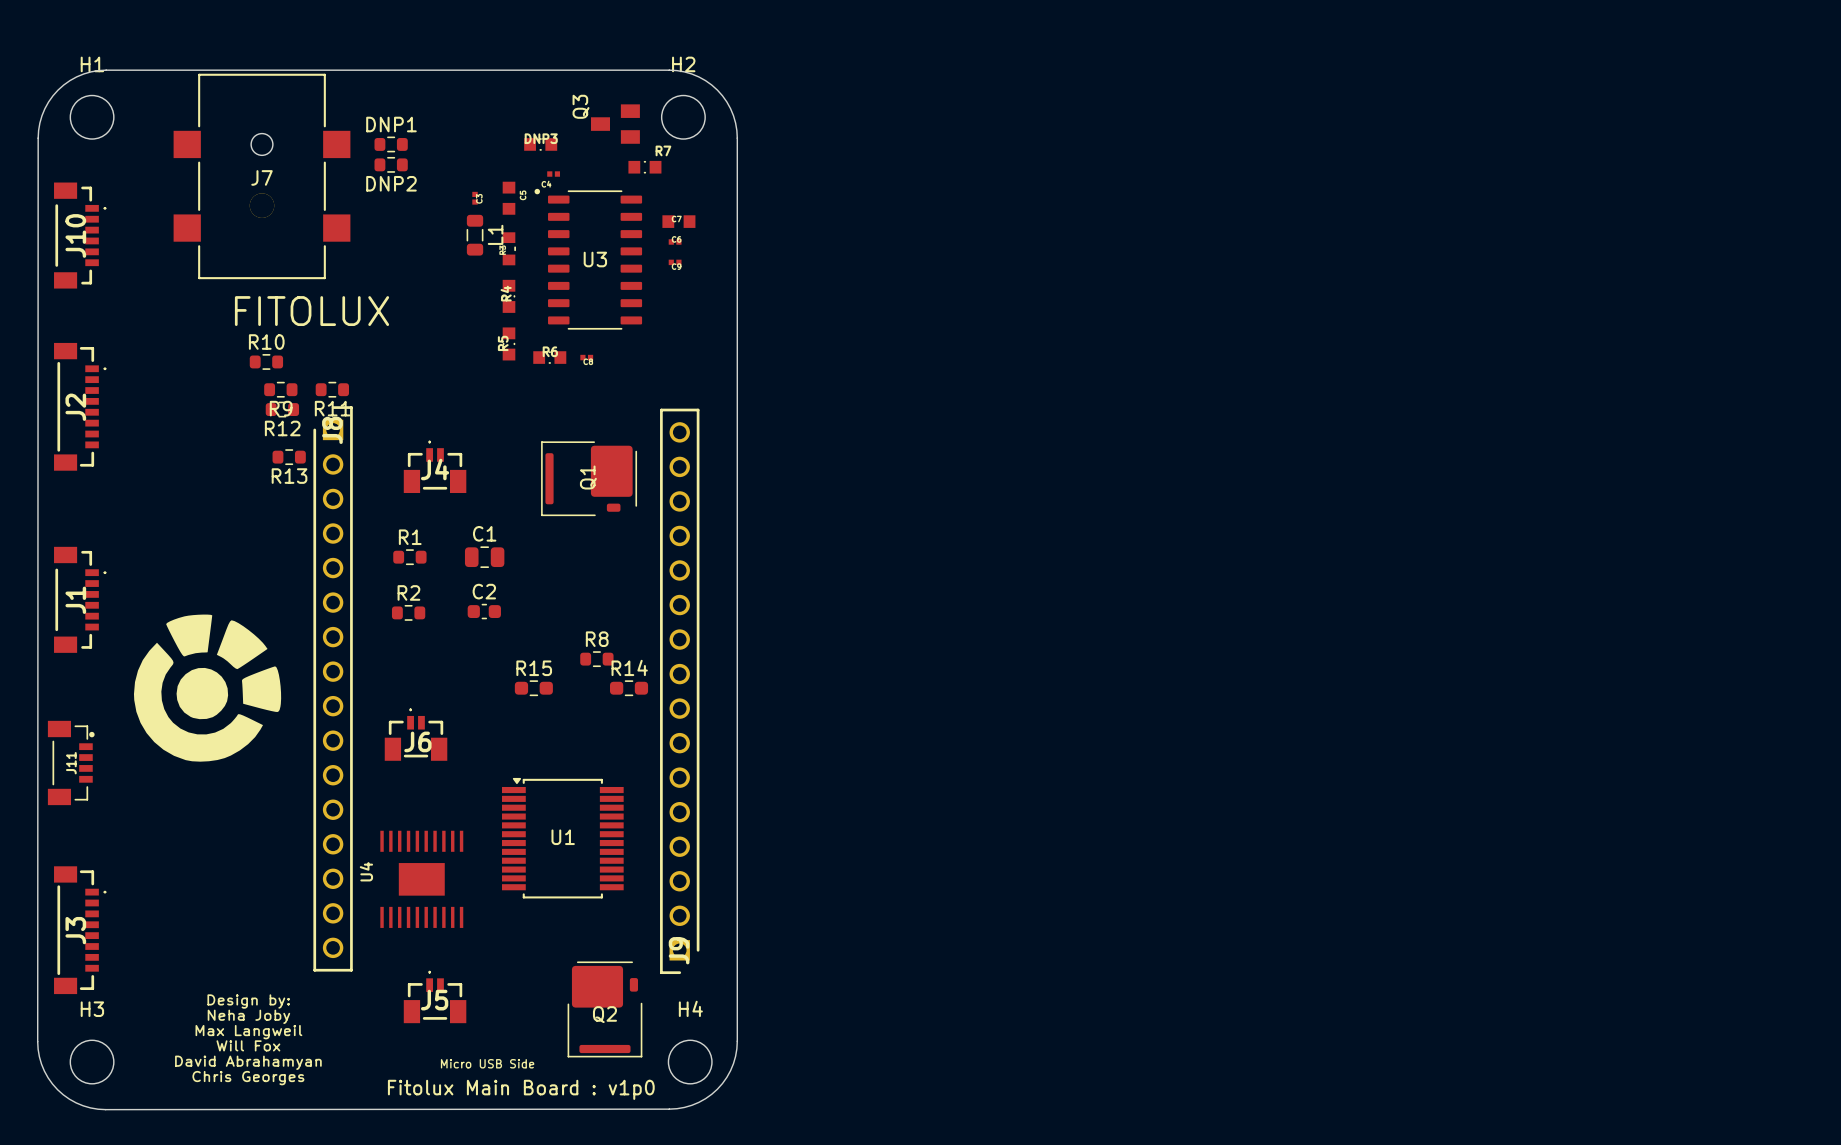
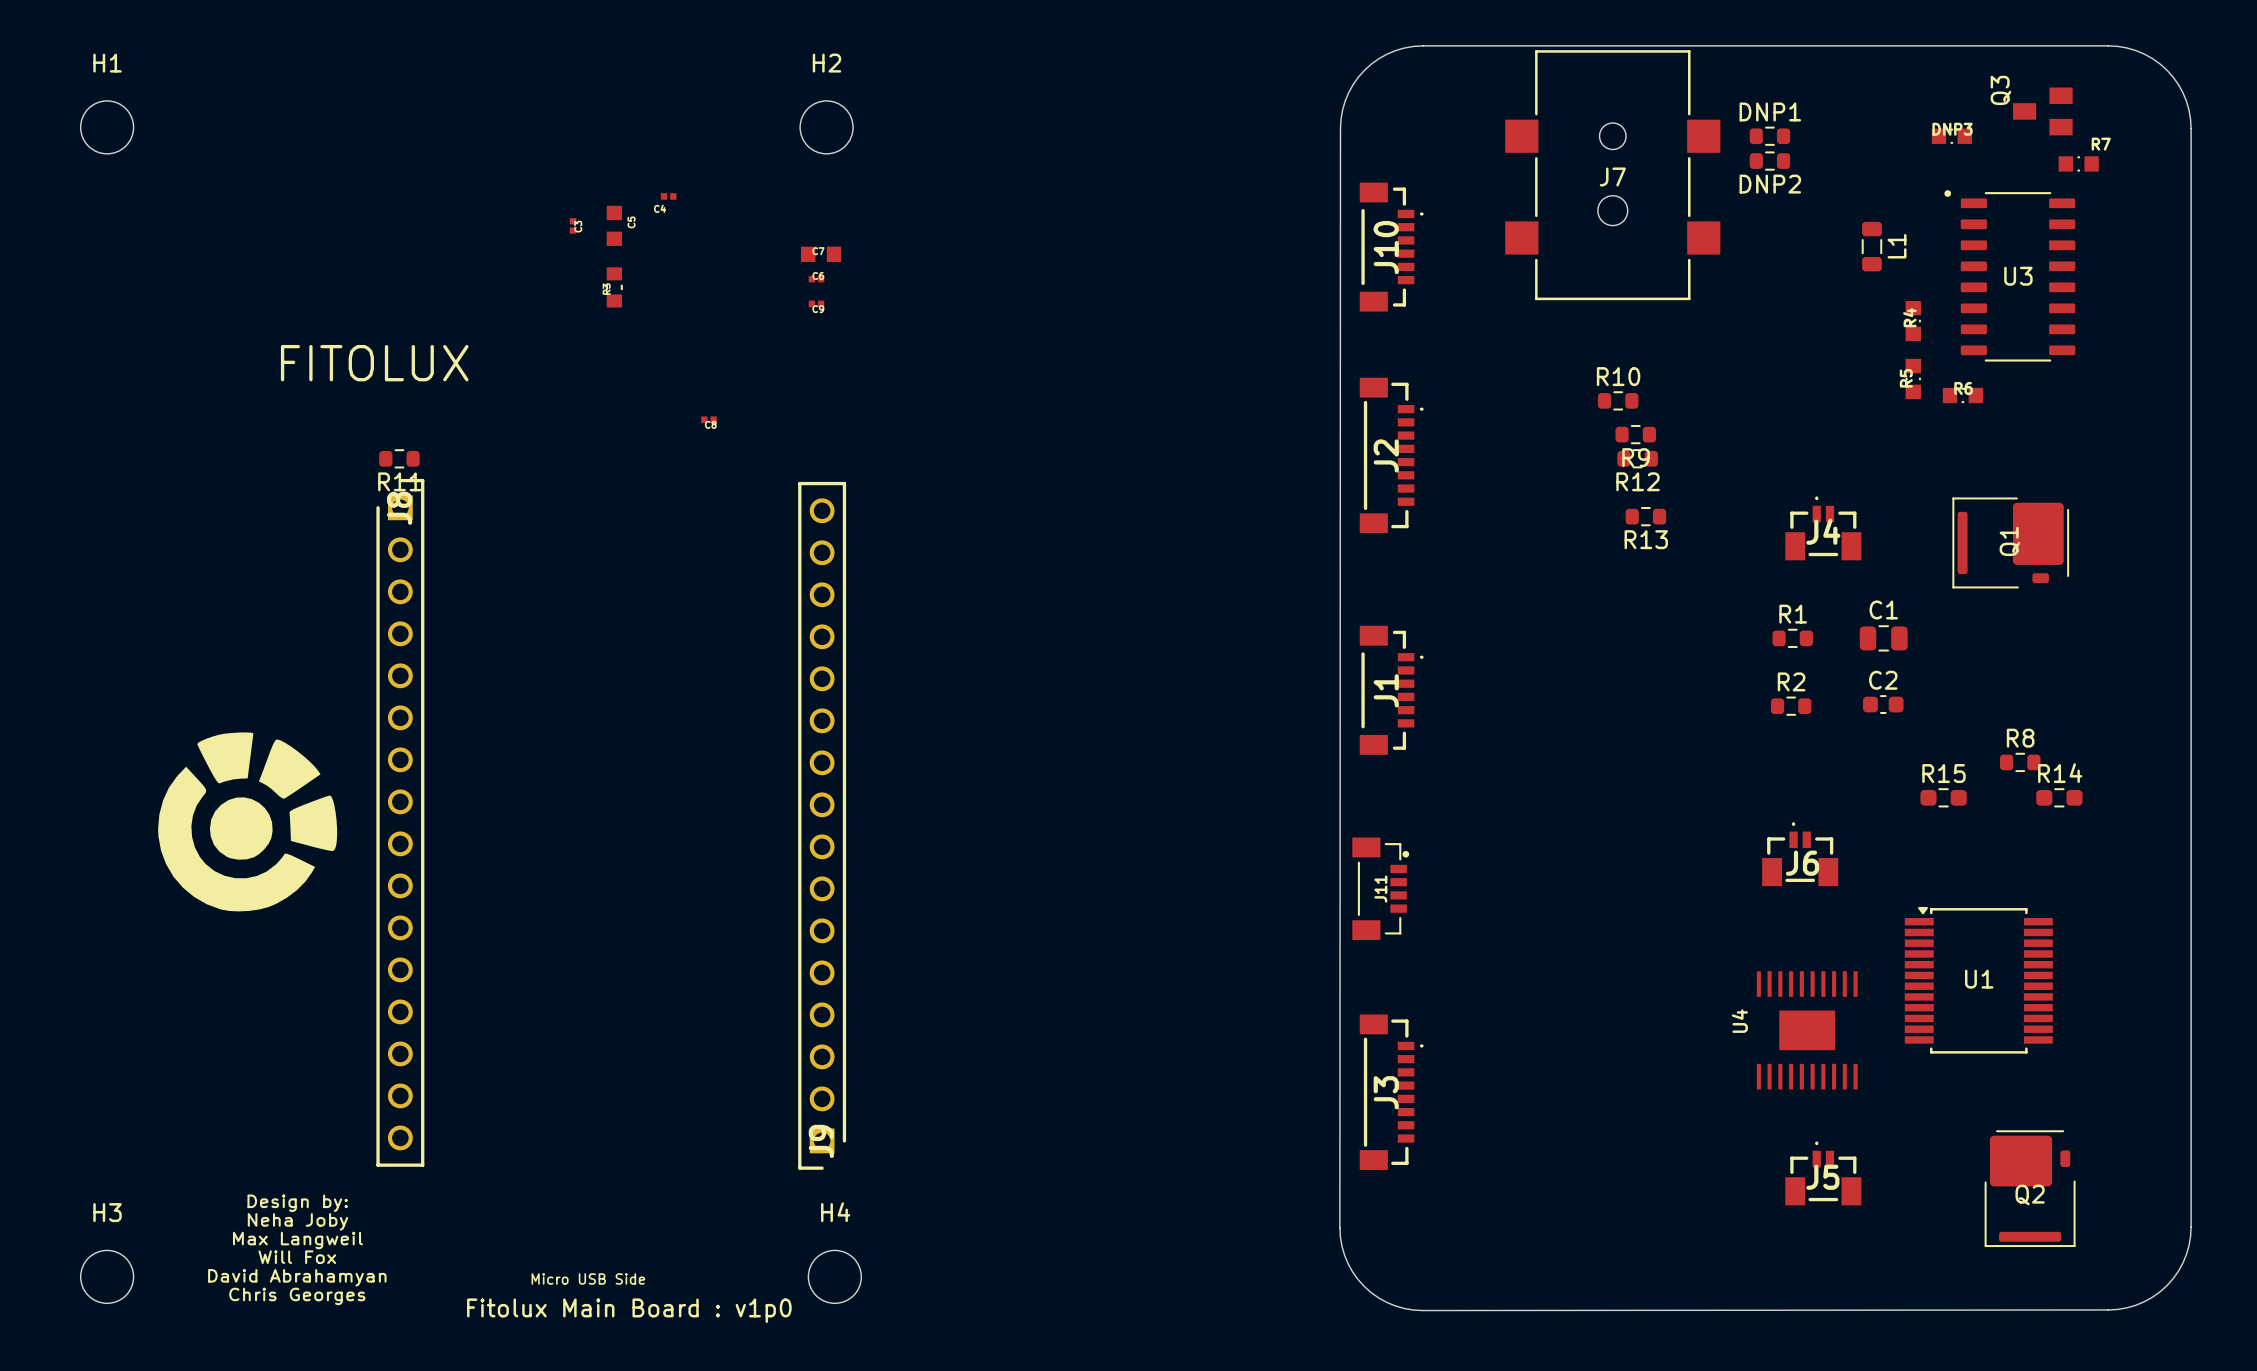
board edge: none -> (1423, 45) (2108, 45) (2135, 50) (2152, 58) (2166, 70) (2178, 84) (2189, 110) (2191, 128) (2191, 1227) (2189, 1245) (2178, 1271) (2166, 1285) (2152, 1297) (2126, 1307) (2108, 1309) (1422, 1310) (1404, 1308) (1378, 1297) (1364, 1286) (1352, 1271) (1341, 1246) (1339, 1227) (1341, 119) (1348, 92) (1364, 70) (1387, 54) (1404, 47) (1423, 45)
board edge: (106, 70) (669, 70) (684, 71) (698, 76) (711, 85) (726, 101) (733, 115) (737, 138) (737, 1041) (735, 1056) (730, 1070) (717, 1089) (705, 1098) (691, 1105) (669, 1109) (105, 1109) (90, 1107) (69, 1099) (57, 1089) (48, 1077) (41, 1064) (37, 1041) (38, 130) (41, 115) (48, 101) (63, 85) (83, 73) (106, 70) -> none
J7 footprint: [173, 73, 351, 280] -> [1505, 50, 1721, 301]
Q3 position: (615, 124) -> (2042, 111)
DNP1 position: (391, 144) -> (1769, 136)
DNP3 position: (540, 144) -> (1951, 136)
DNP2 position: (391, 164) -> (1769, 161)
R7 position: (644, 167) -> (2078, 163)
J10 position: (80, 235) -> (1391, 247)
L1 position: (475, 235) -> (1871, 246)
U3 position: (588, 259) -> (2009, 275)
R4 position: (509, 296) -> (1913, 321)
R5 position: (509, 343) -> (1913, 378)
R6 position: (549, 357) -> (1962, 395)
R10 position: (266, 361) -> (1618, 400)
R9 position: (280, 389) -> (1635, 434)
J2 position: (80, 406) -> (1391, 455)
R12 position: (282, 409) -> (1637, 458)
R13 position: (289, 457) -> (1645, 516)
J4 position: (435, 466) -> (1823, 528)
Q1 position: (589, 478) -> (2010, 542)
R1 position: (409, 557) -> (1792, 638)
C1 position: (484, 557) -> (1883, 638)
J1 position: (80, 599) -> (1391, 690)
C2 position: (484, 611) -> (1883, 704)
R2 position: (408, 612) -> (1791, 706)
R8 position: (596, 659) -> (2020, 762)
R15 position: (533, 688) -> (1943, 797)
R14 position: (629, 688) -> (2059, 797)
J6 position: (416, 734) -> (1800, 854)
J11 position: (71, 762) -> (1380, 888)
U1 position: (562, 838) -> (1978, 980)
U4 position: (421, 879) -> (1807, 1030)
J3 position: (80, 930) -> (1391, 1092)
J5 position: (435, 997) -> (1823, 1173)
Q2 position: (604, 1009) -> (2030, 1188)

